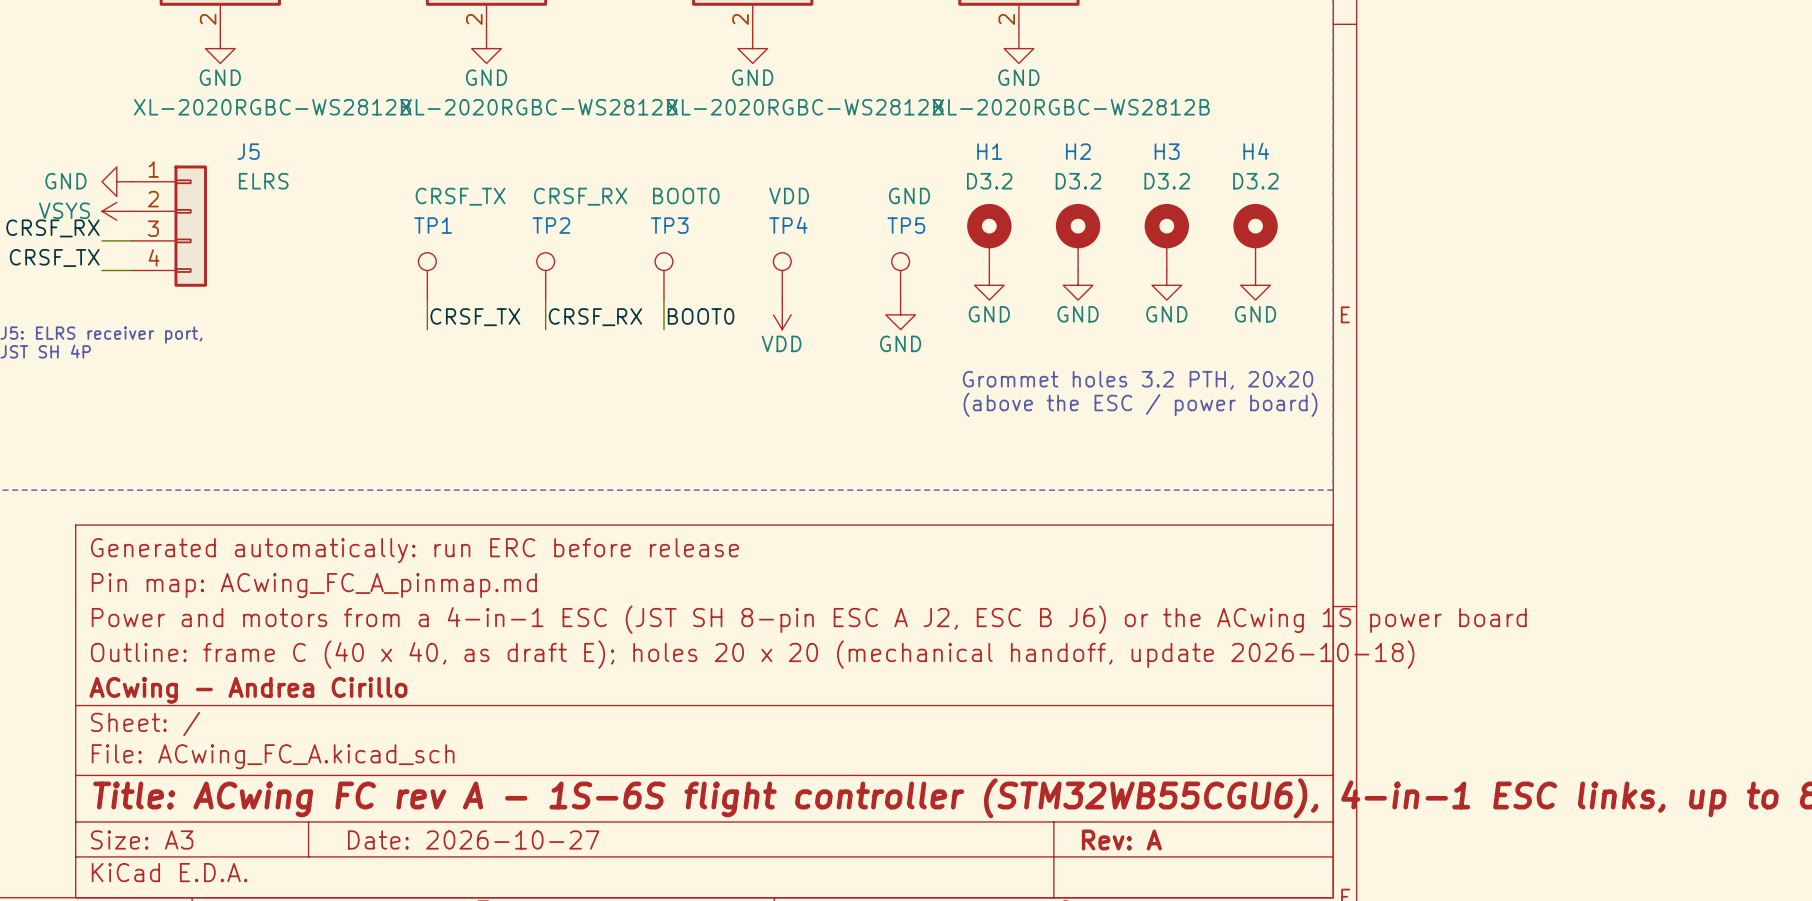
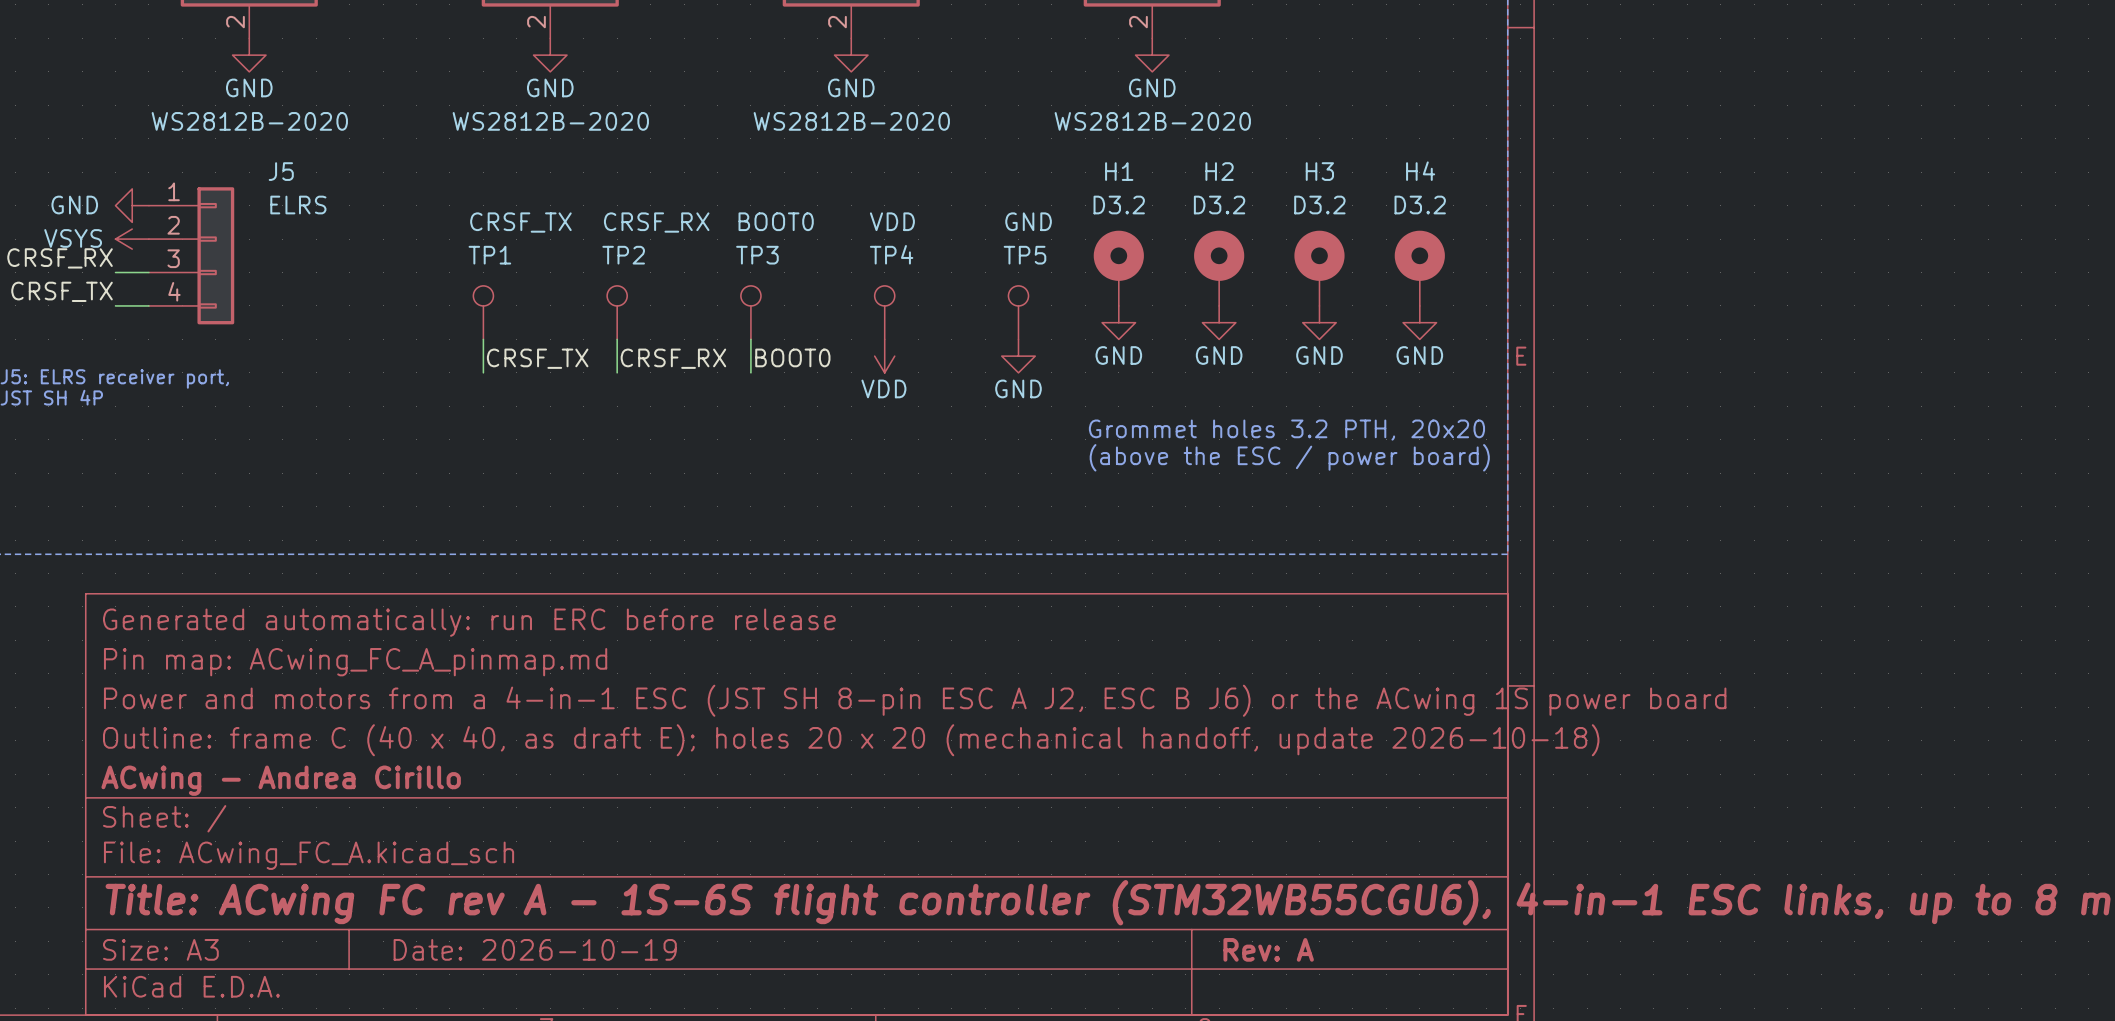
part value: XL-2020RGBC-WS2812B (272, 107) -> WS2812B-2020 (249, 121)
part value: XL-2020RGBC-WS2812B (538, 107) -> WS2812B-2020 (550, 121)
part value: XL-2020RGBC-WS2812B (804, 107) -> WS2812B-2020 (851, 121)
part value: XL-2020RGBC-WS2812B (1071, 107) -> WS2812B-2020 (1152, 121)
title block: Date: 2026-10-27 (473, 839) -> Date: 2026-10-19 (535, 949)

